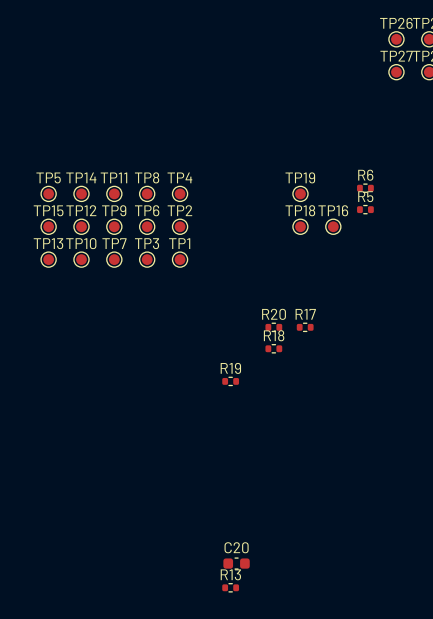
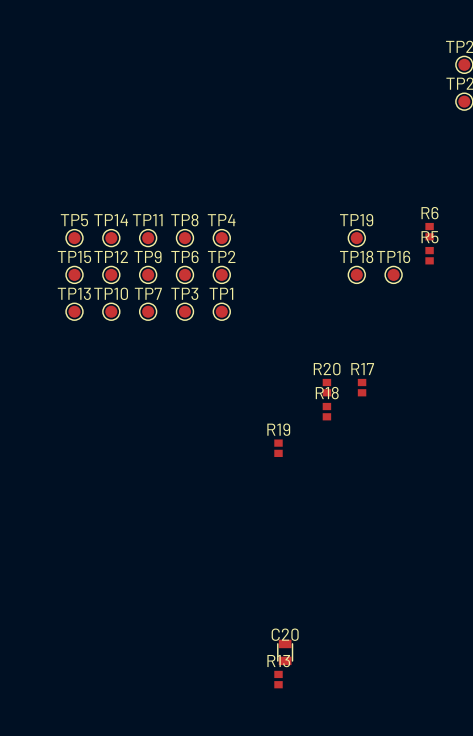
R6 footprint: [357, 183, 374, 193] -> [425, 222, 434, 241]
R5 footprint: [357, 204, 374, 215] -> [425, 246, 434, 265]
R20 footprint: [265, 322, 283, 333] -> [322, 378, 332, 397]
R17 footprint: [296, 322, 314, 333] -> [357, 378, 367, 397]
R18 footprint: [265, 344, 283, 354] -> [322, 402, 332, 421]
R19 footprint: [222, 376, 240, 387] -> [274, 439, 283, 458]
C20 footprint: [223, 557, 250, 570] -> [277, 639, 294, 666]
R13 footprint: [222, 583, 240, 593] -> [274, 670, 283, 689]

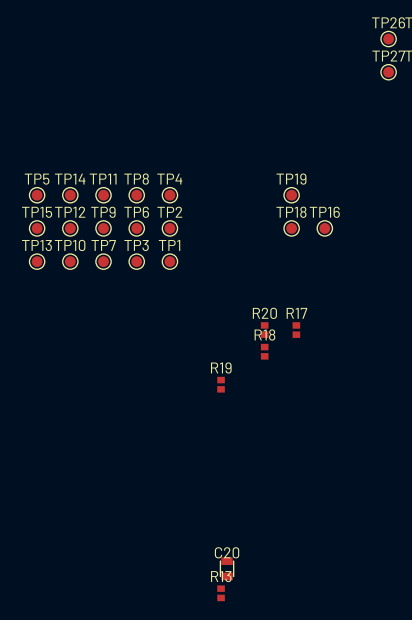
R6: (429, 231) -> none
R5: (429, 255) -> none

